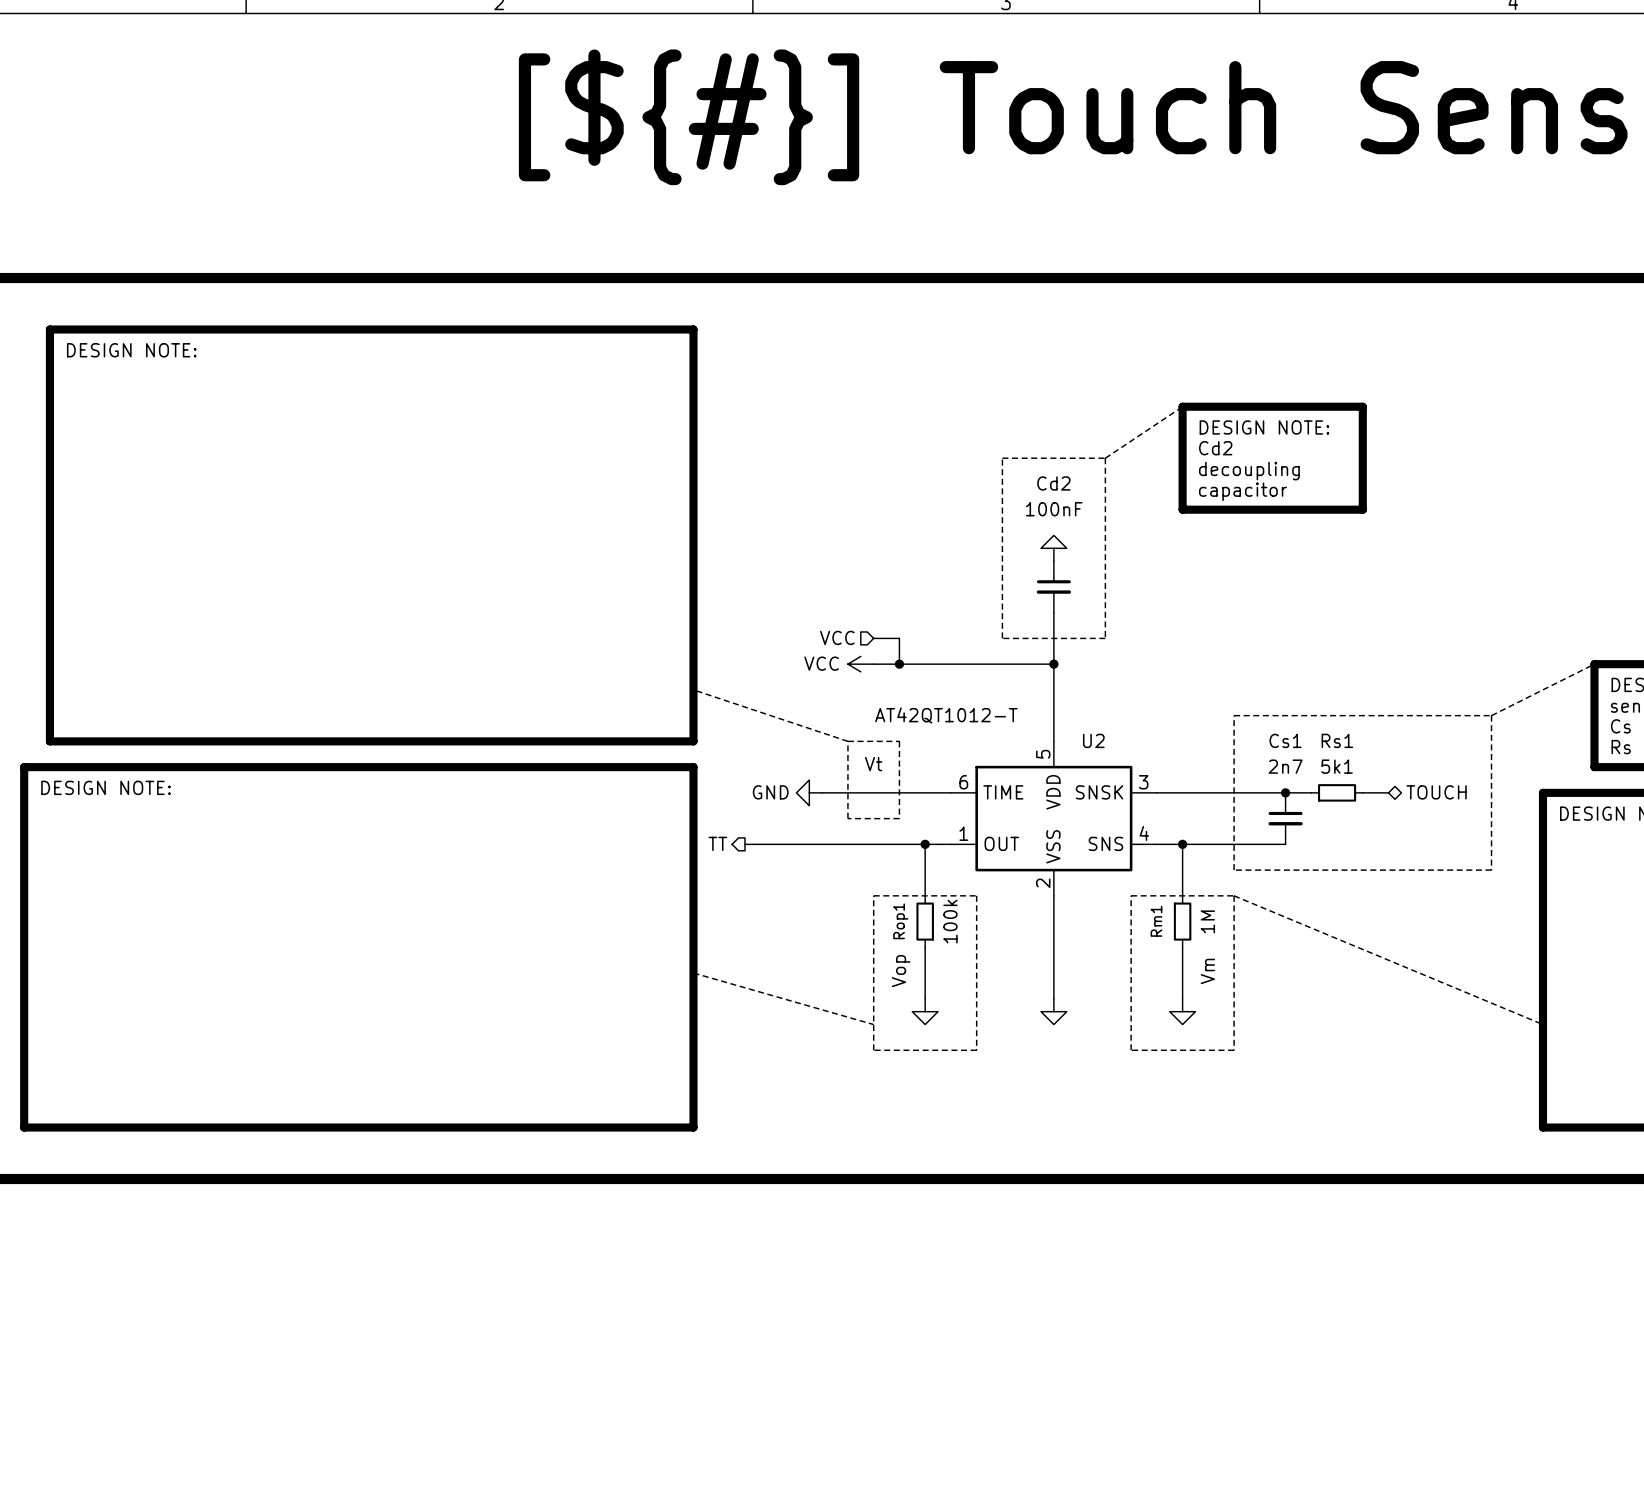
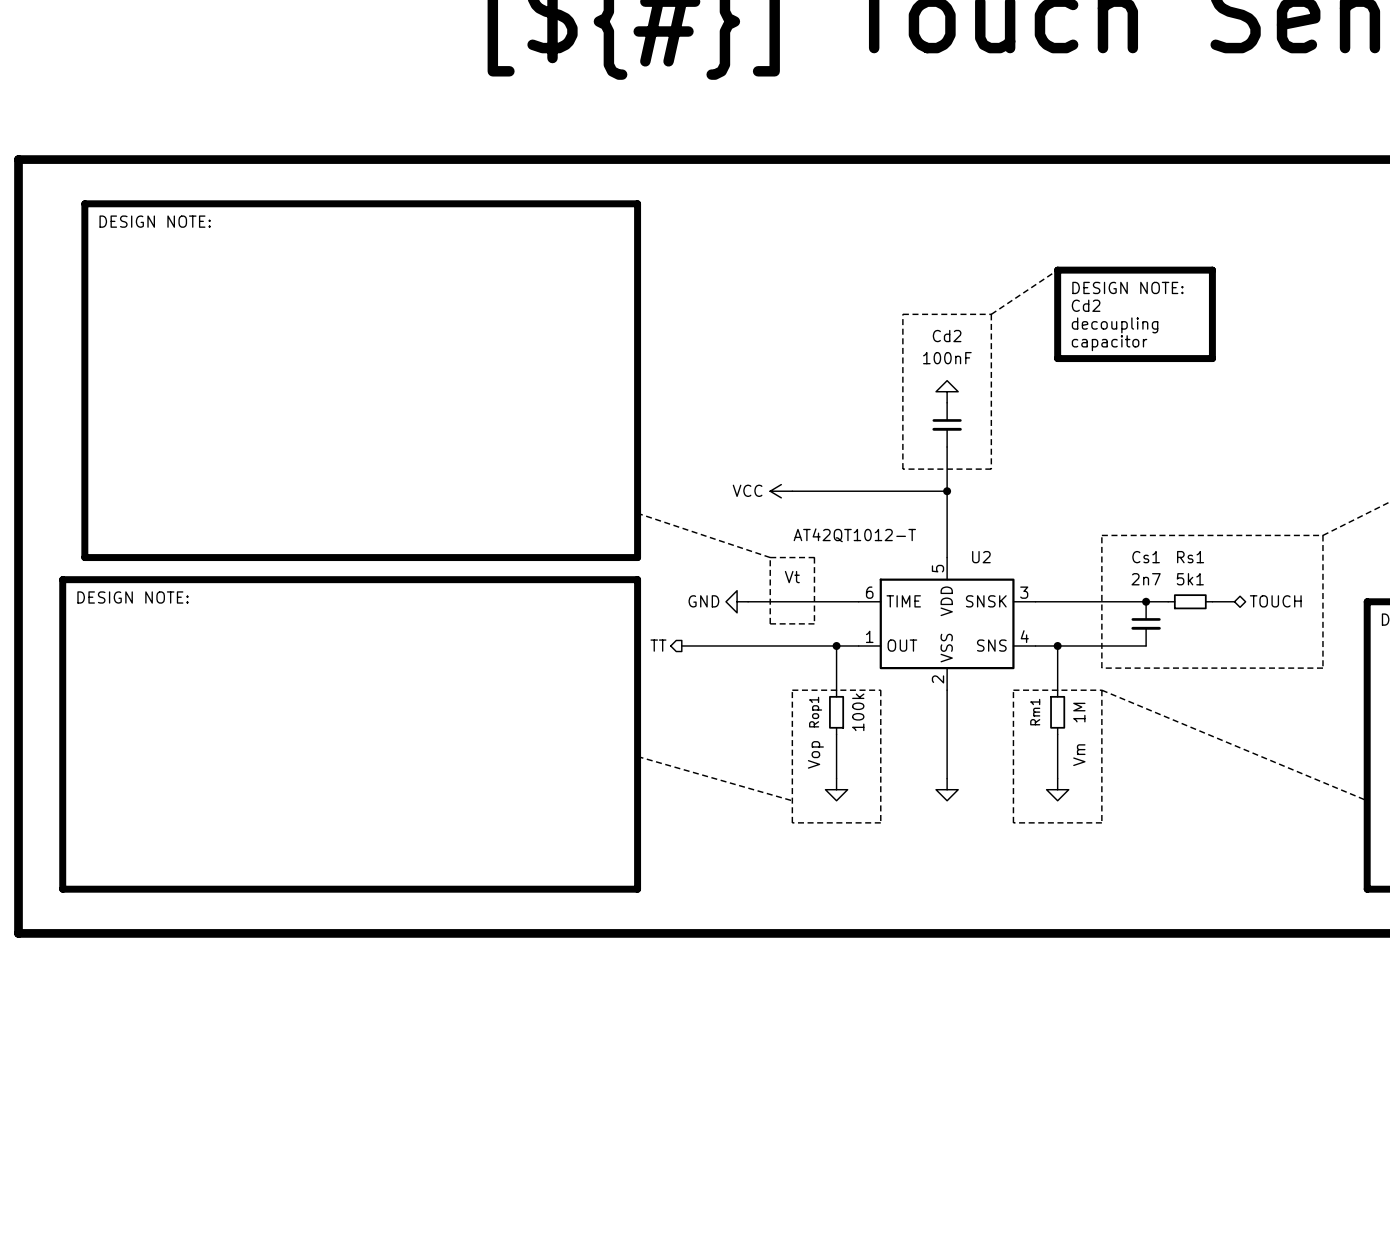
hierarchical label: VCC (837, 637) -> none
wire: (873, 638) (899, 638) (899, 664) -> none
junction: (899, 664) -> none

